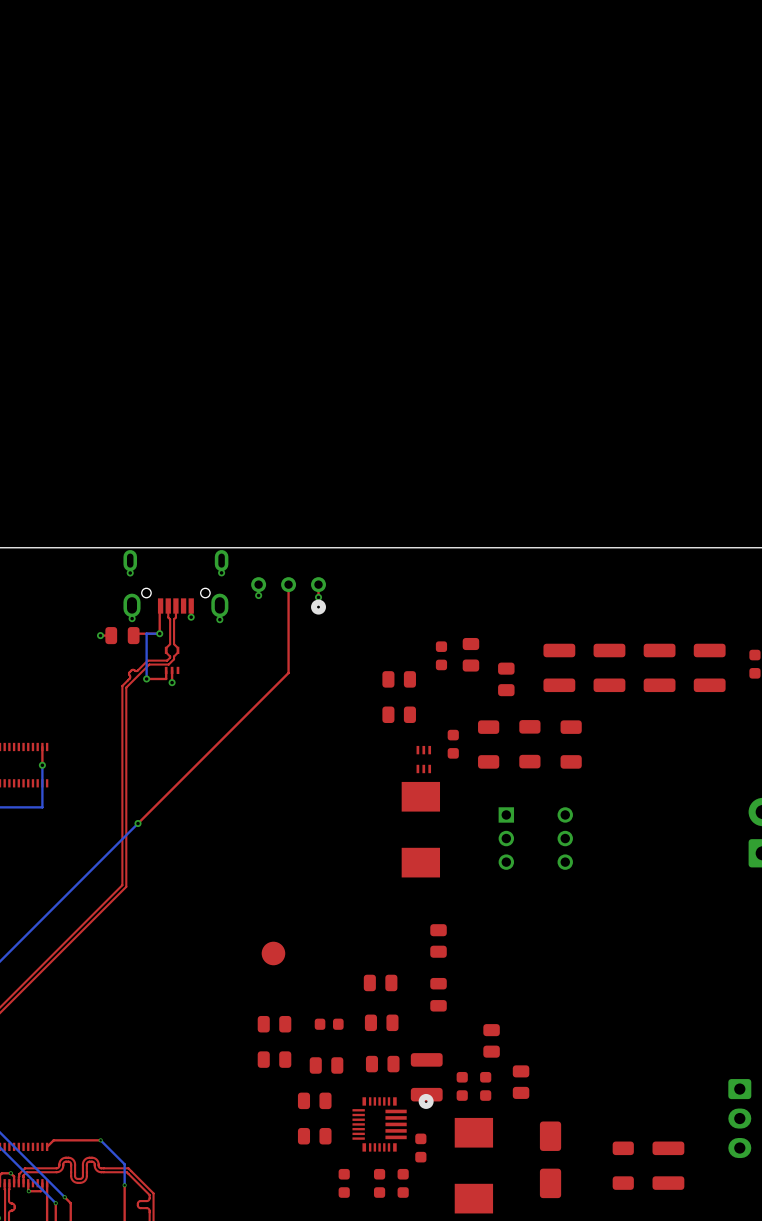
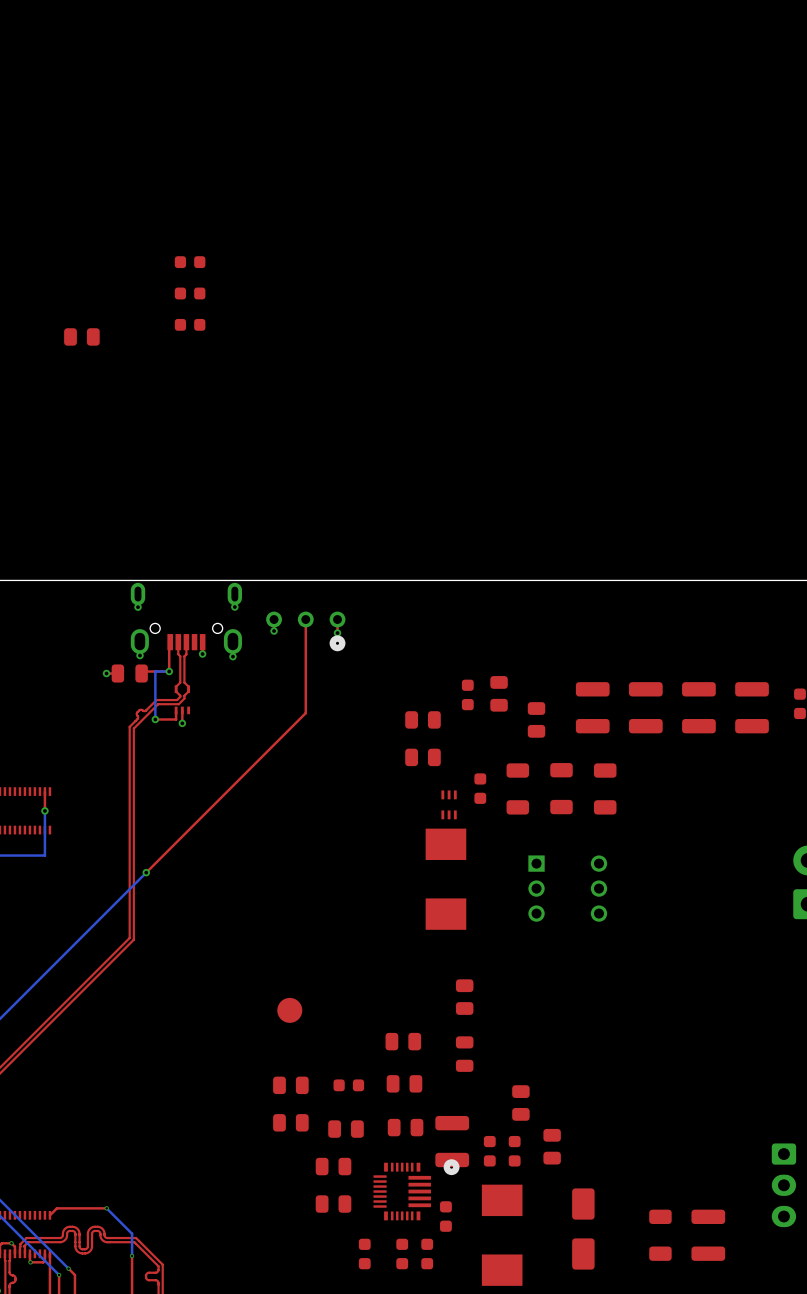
part: none -> (190, 262)
part: none -> (190, 293)
part: none -> (190, 324)
part: none -> (81, 336)

